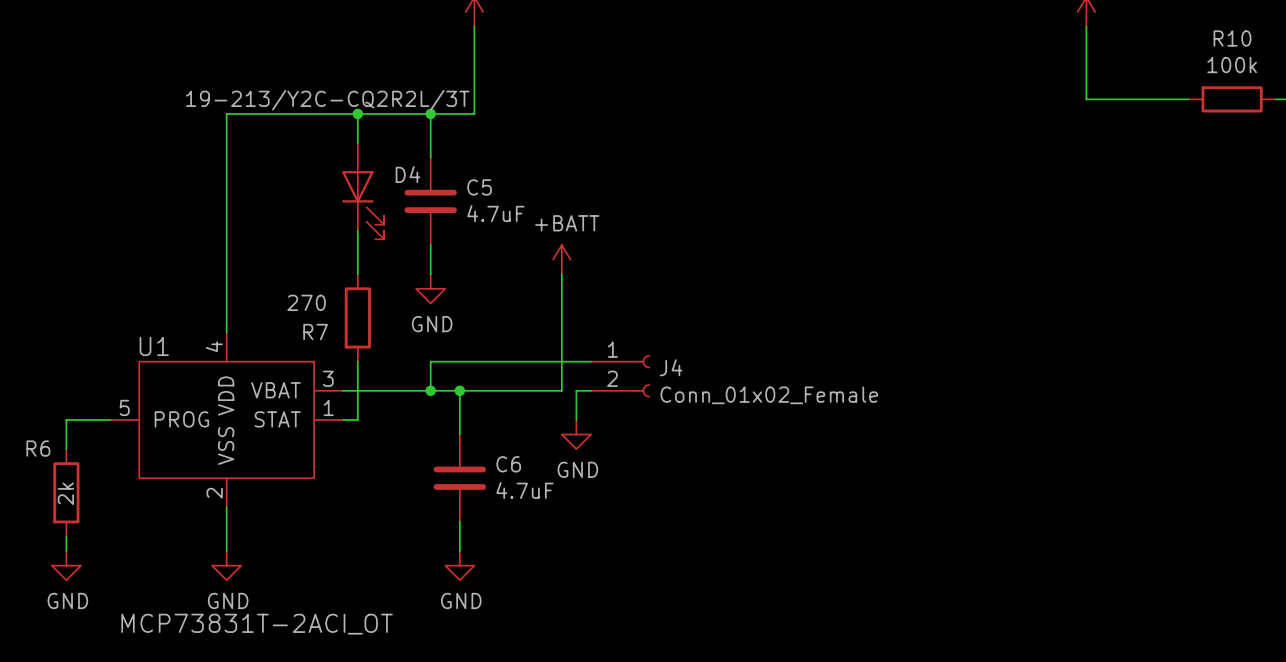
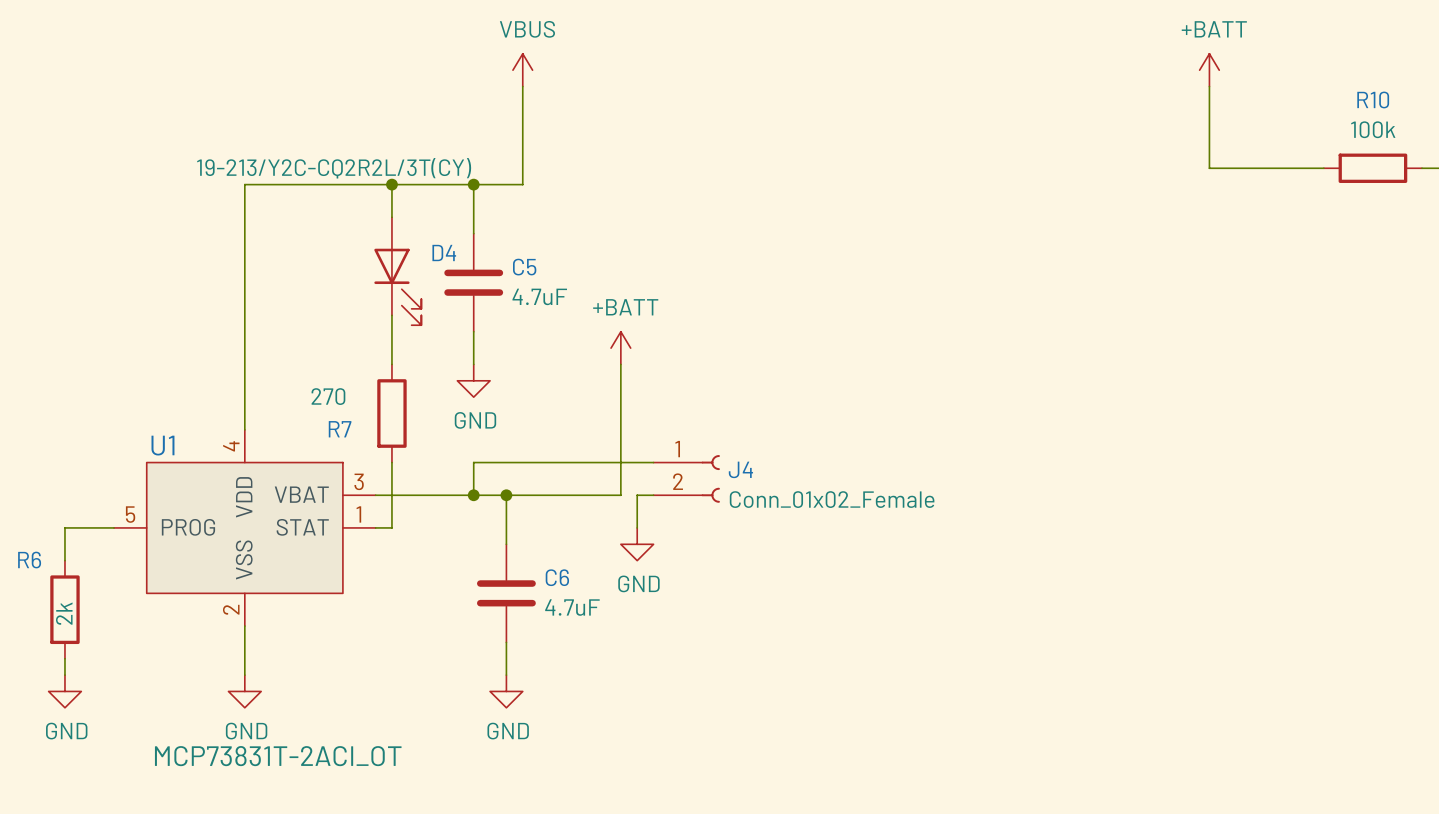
D4 value: 19-213/Y2C-CQ2R2L/3T (327, 100) -> 19-213/Y2C-CQ2R2L/3T(CY) (334, 168)

